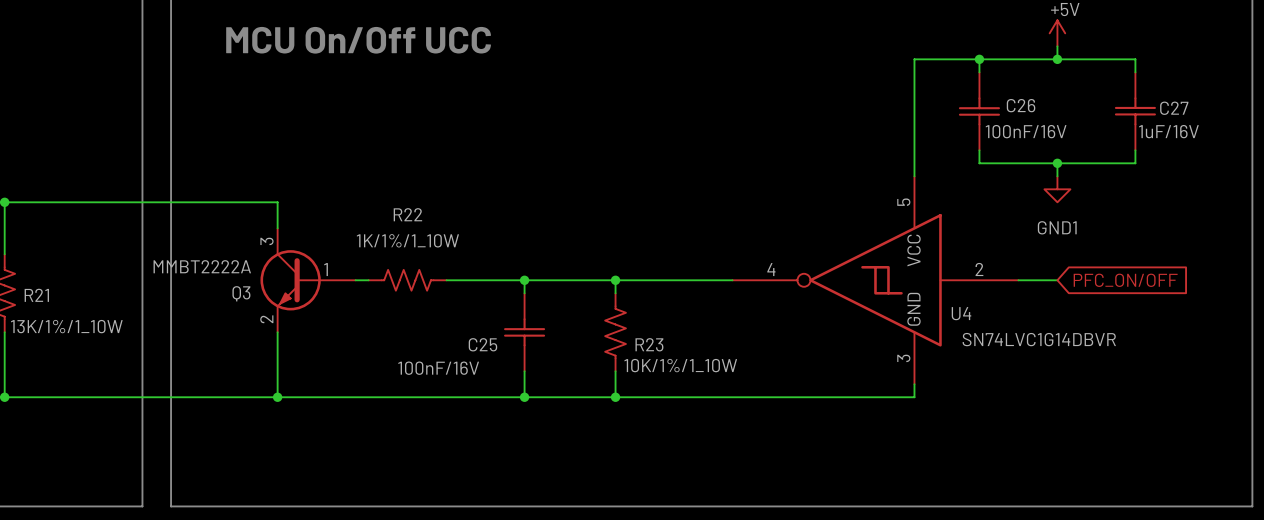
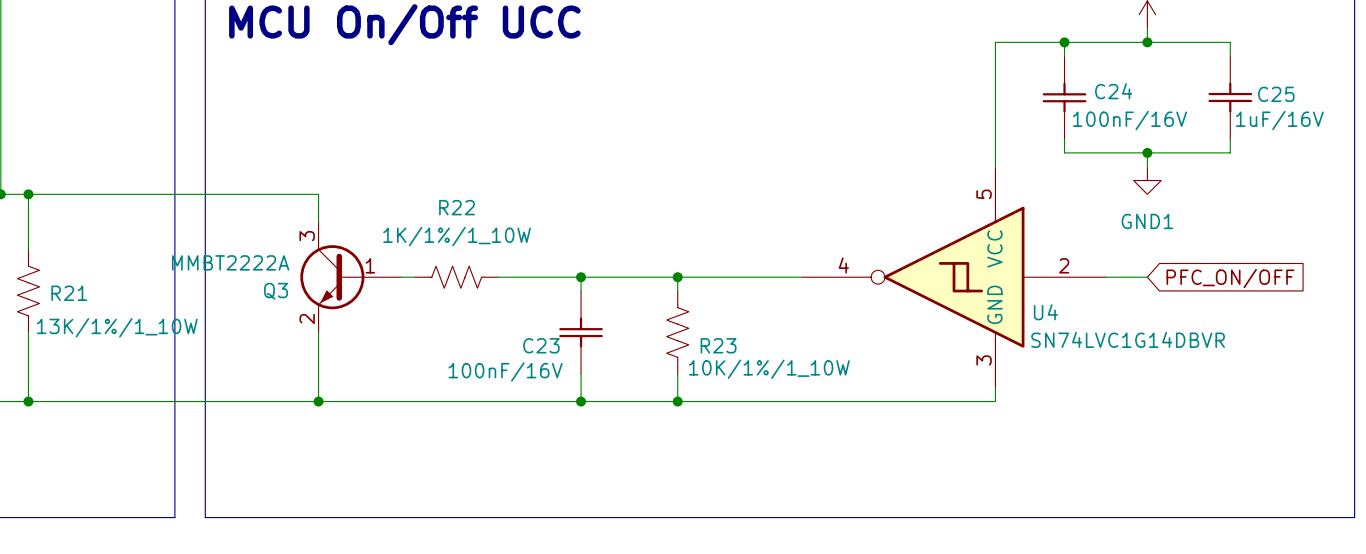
C26 name: C26 (1021, 105) -> C24 (1113, 91)
C27 name: C27 (1174, 108) -> C25 (1276, 94)
C25 name: C25 (482, 344) -> C23 (541, 345)

